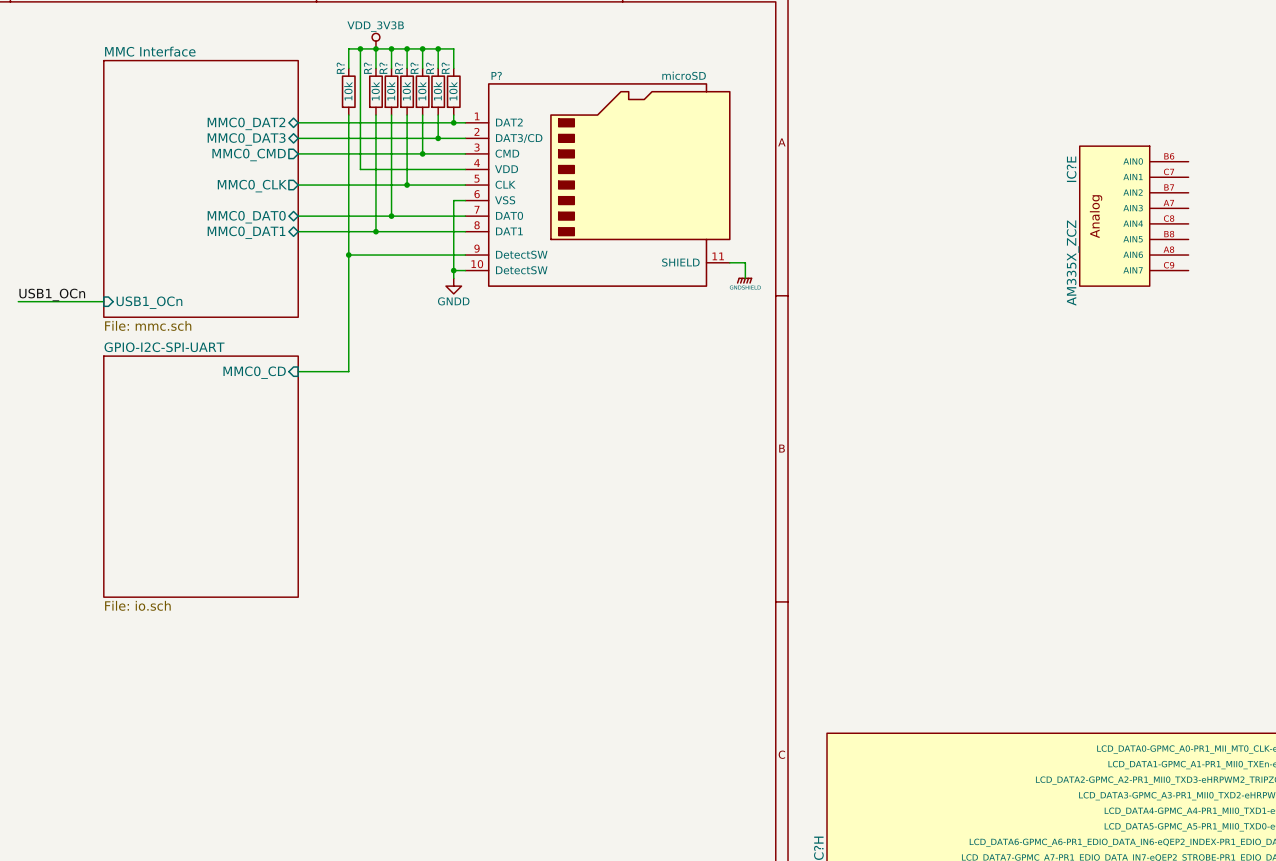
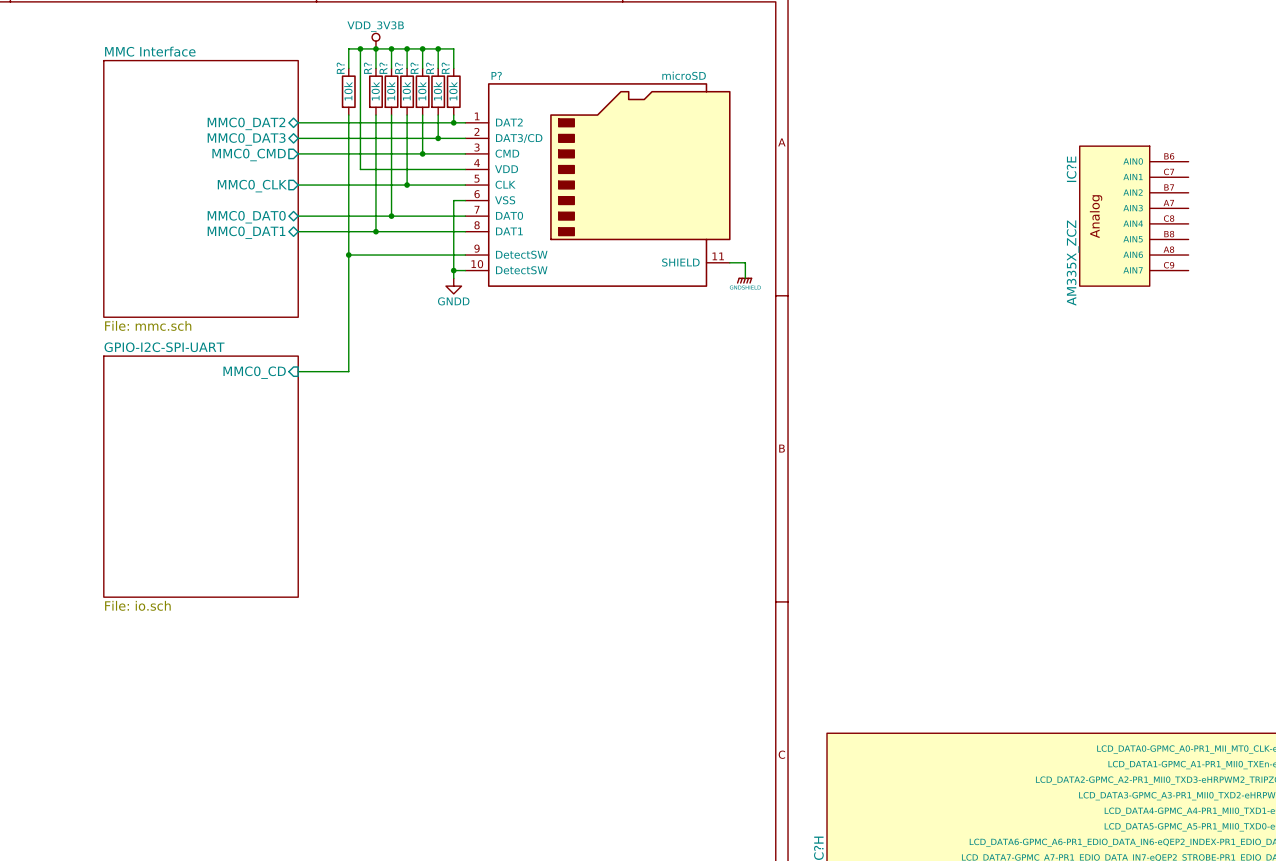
label: USB1_OCn (52, 294) -> none
wire: (18, 301) (103, 301) -> none
sheet pin: USB1_OCn (149, 302) -> none

